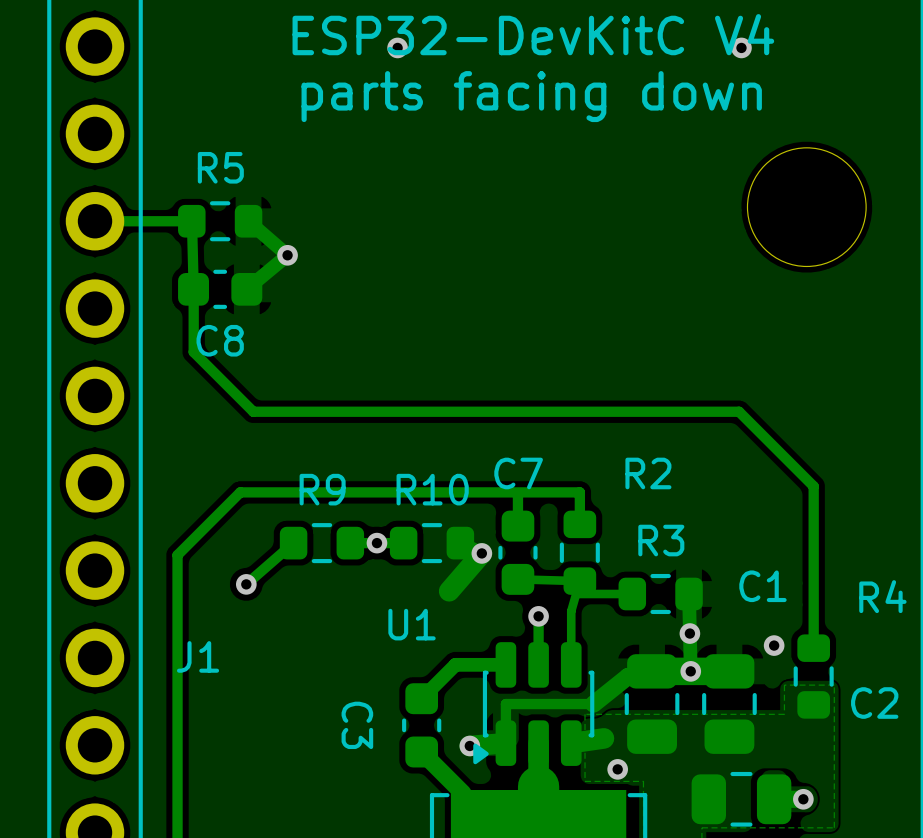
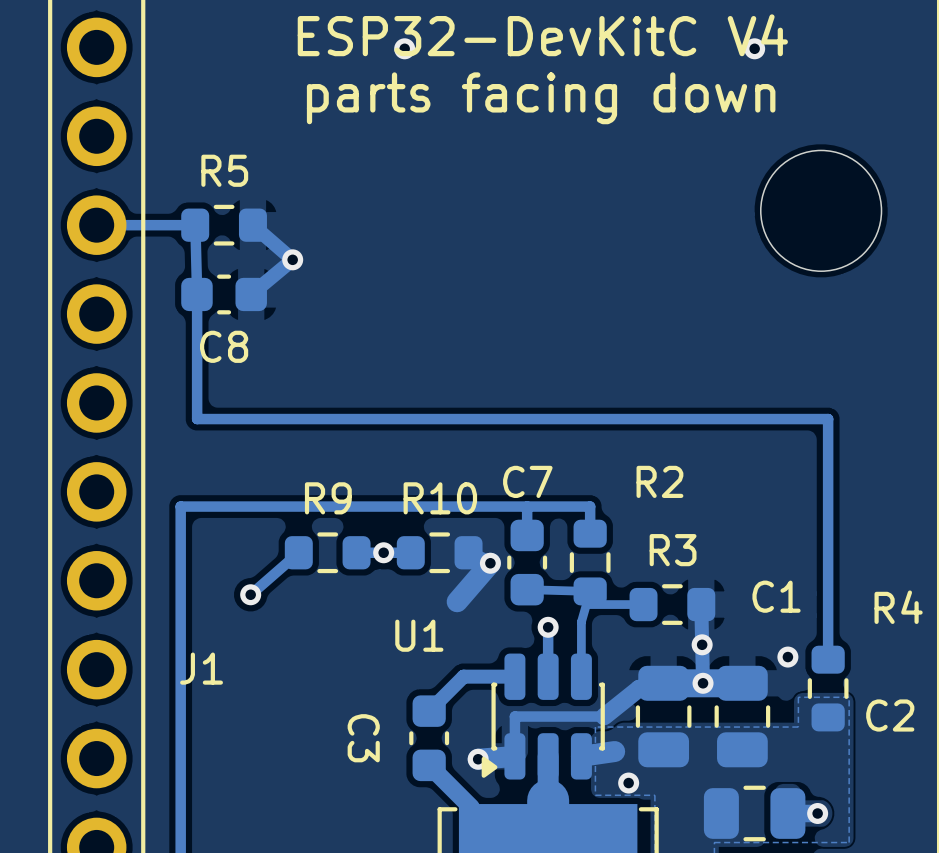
track: (193, 352) (253, 411) -> (197, 358) (197, 419) (257, 419)
track: (739, 411) (813, 486) -> (752, 419) (828, 419) (828, 495)
track: (579, 497) (579, 492) (240, 492) (177, 555) -> (590, 506) (180, 506) (180, 565)

